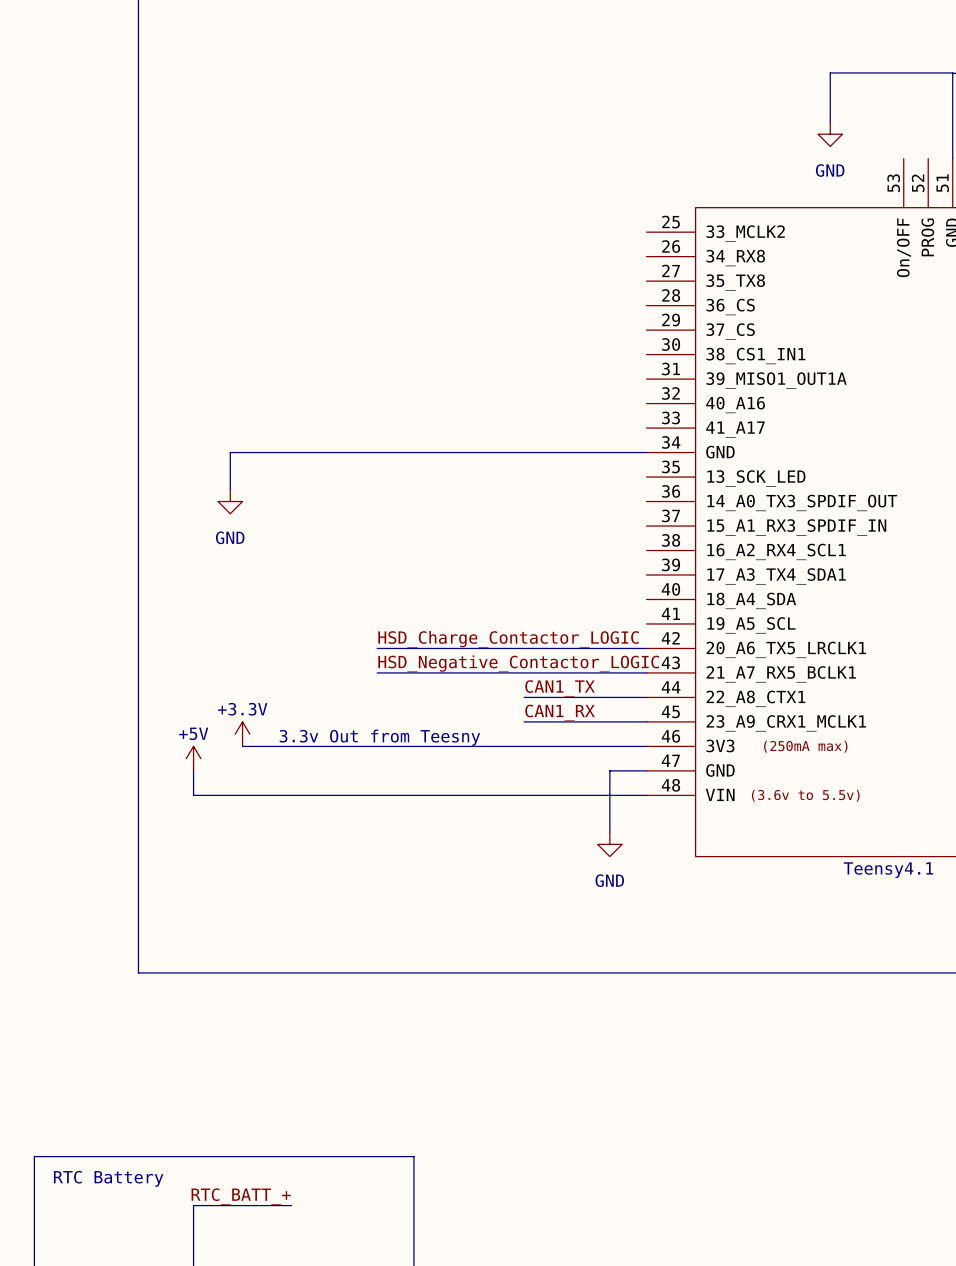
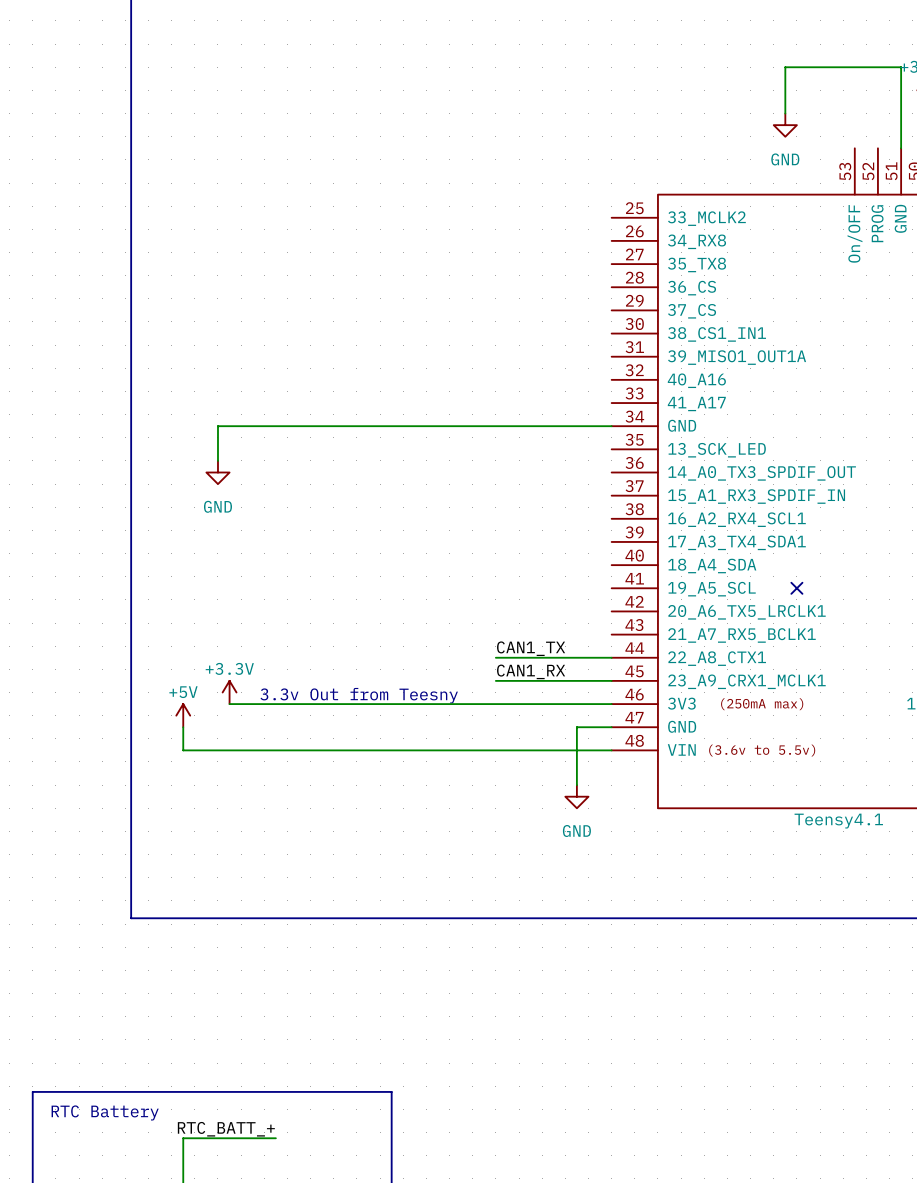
no-connect mark: none -> (796, 588)
label: HSD_Charge_Contactor_LOGIC (508, 639) -> none
wire: (377, 648) (646, 648) -> none
label: HSD_Negative_Contactor_LOGIC (518, 663) -> none
wire: (377, 672) (646, 672) -> none

